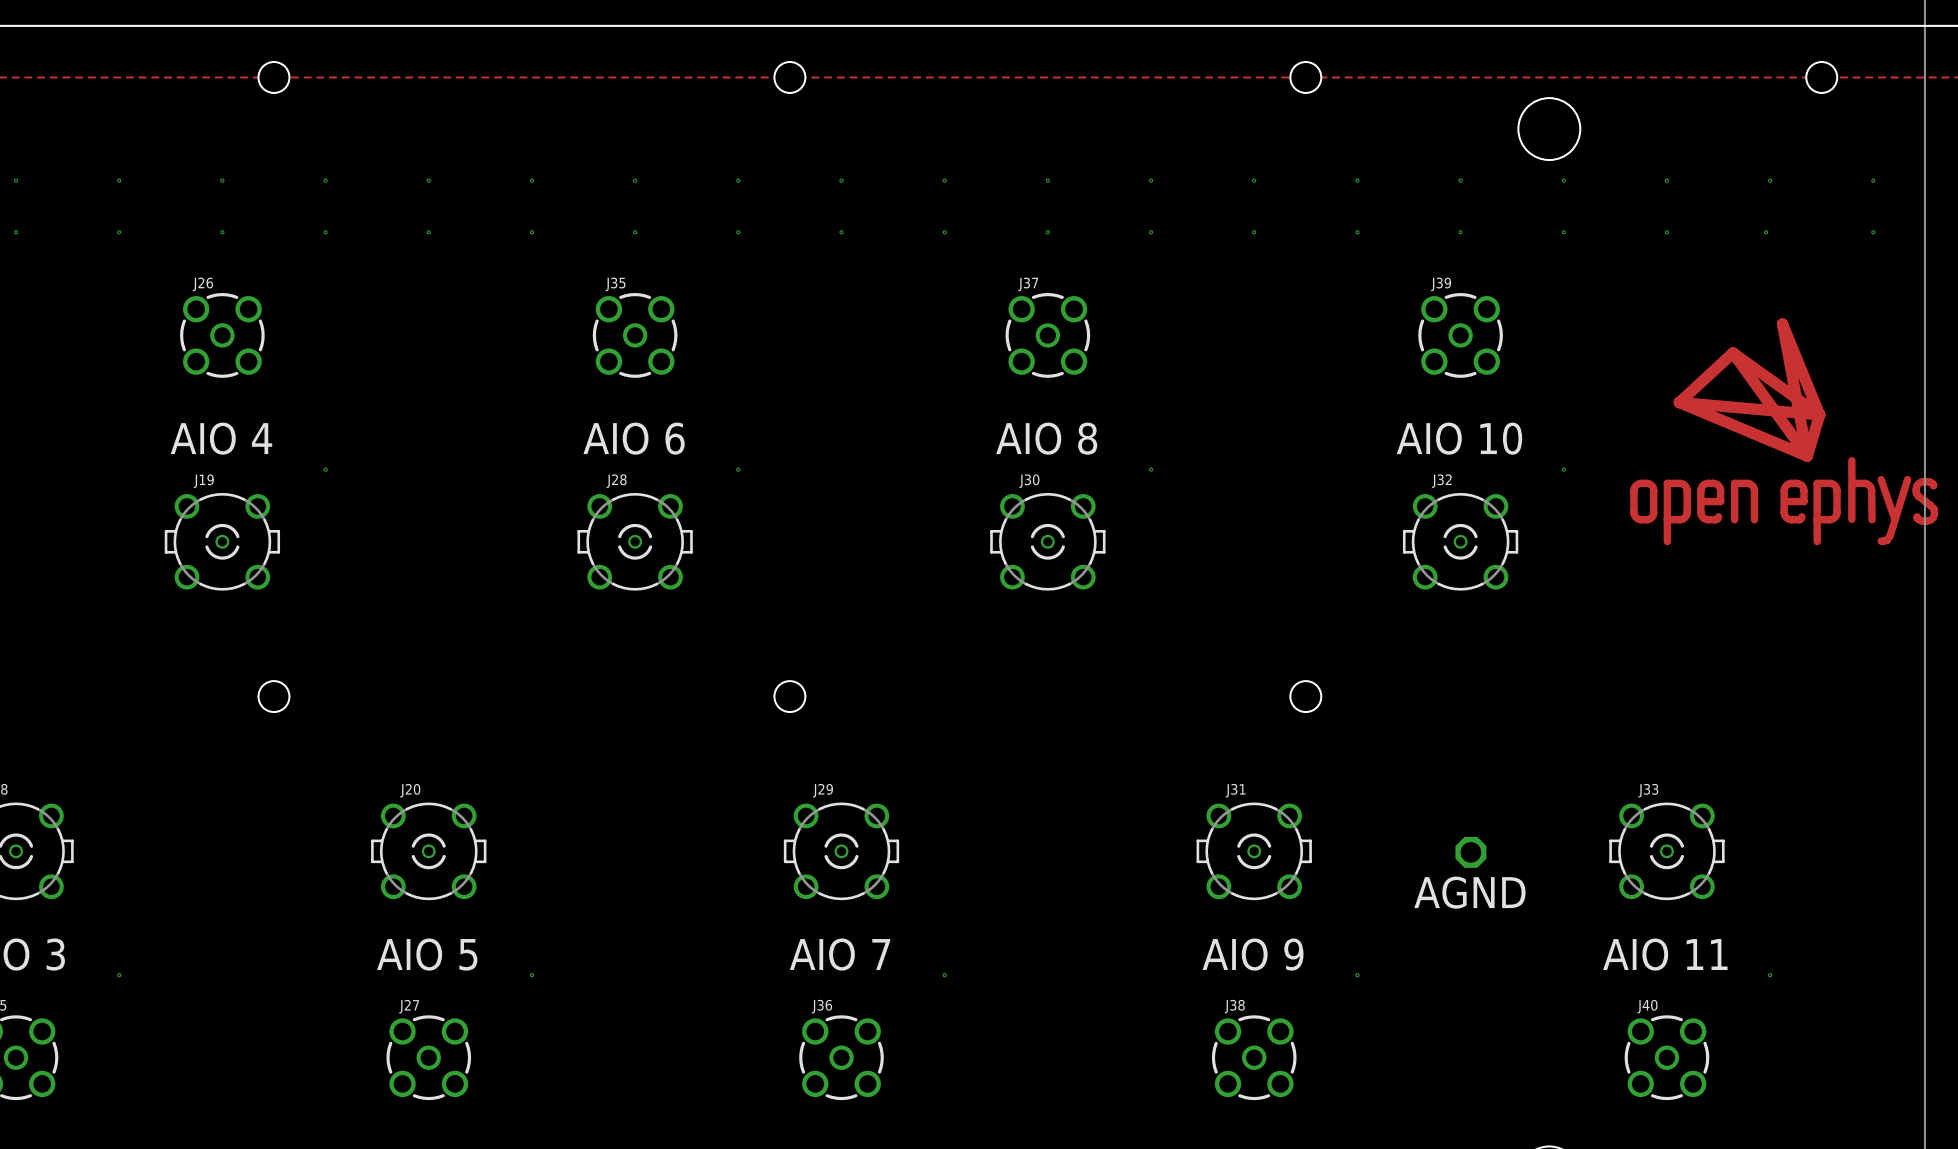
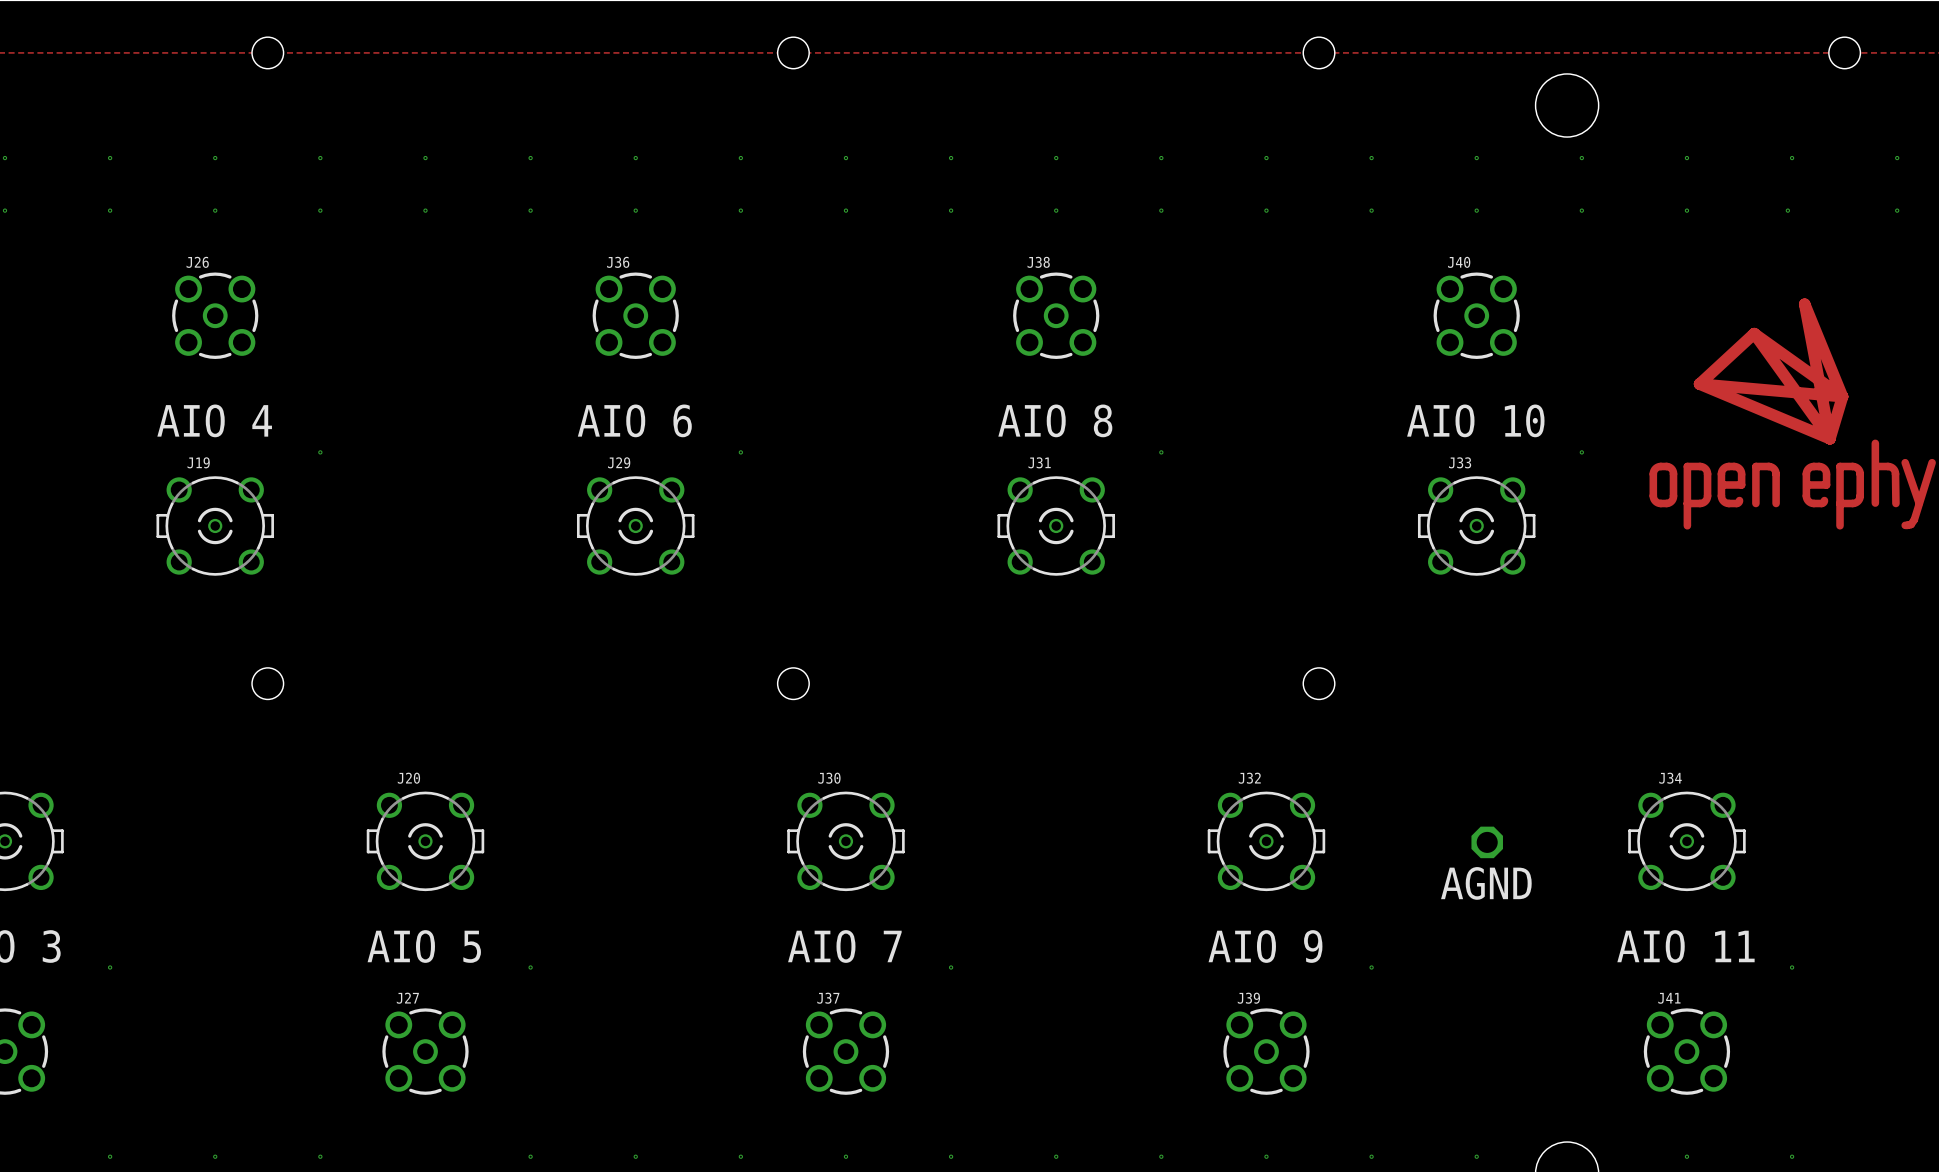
J35 name: J35 (615, 284) -> J36 (618, 262)
J37 name: J37 (1028, 284) -> J38 (1038, 262)
J39 name: J39 (1441, 284) -> J40 (1459, 262)
J28 name: J28 (616, 481) -> J29 (619, 462)
J30 name: J30 (1029, 481) -> J31 (1039, 462)
J32 name: J32 (1441, 481) -> J33 (1460, 462)
J29 name: J29 (822, 790) -> J30 (829, 778)
J31 name: J31 (1235, 790) -> J32 (1249, 778)
J33 name: J33 (1648, 790) -> J34 (1670, 778)
J36 name: J36 (822, 1006) -> J37 (828, 998)
J38 name: J38 (1234, 1006) -> J39 (1248, 998)
J40 name: J40 (1647, 1006) -> J41 (1669, 998)

